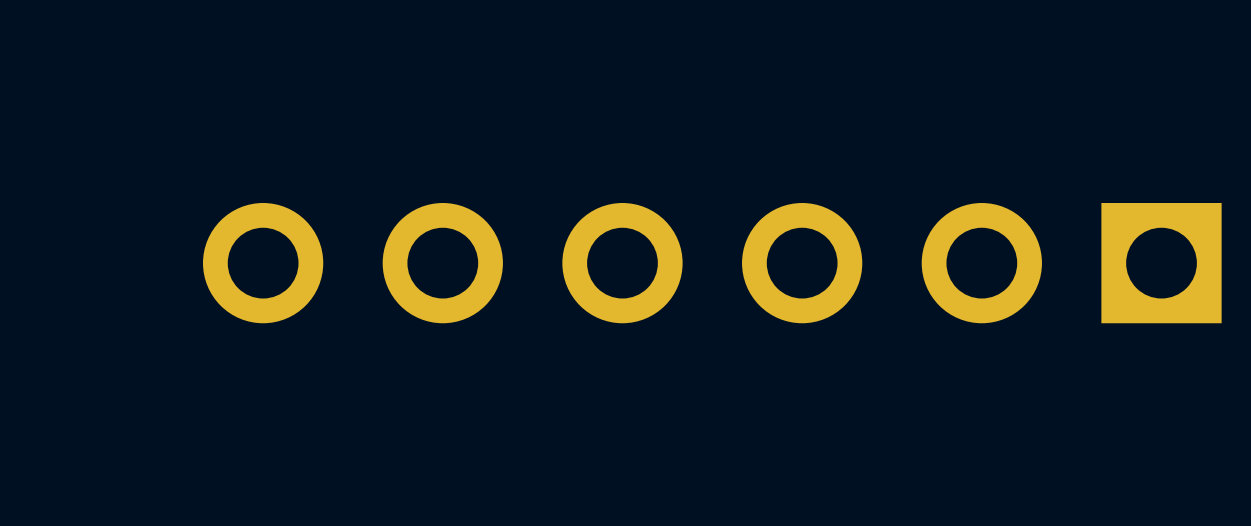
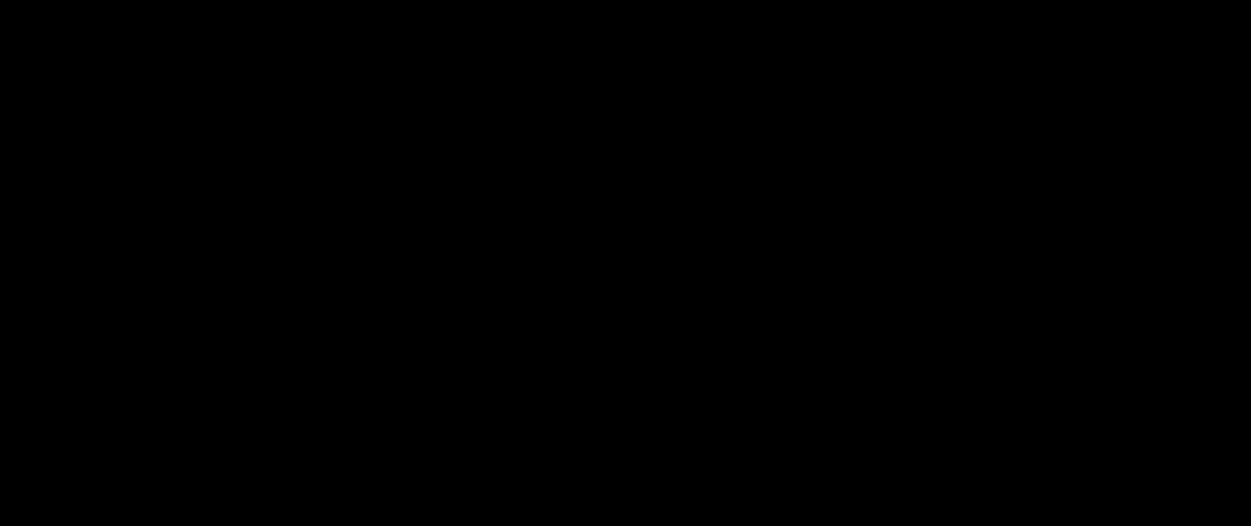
part: (712, 263) -> none

